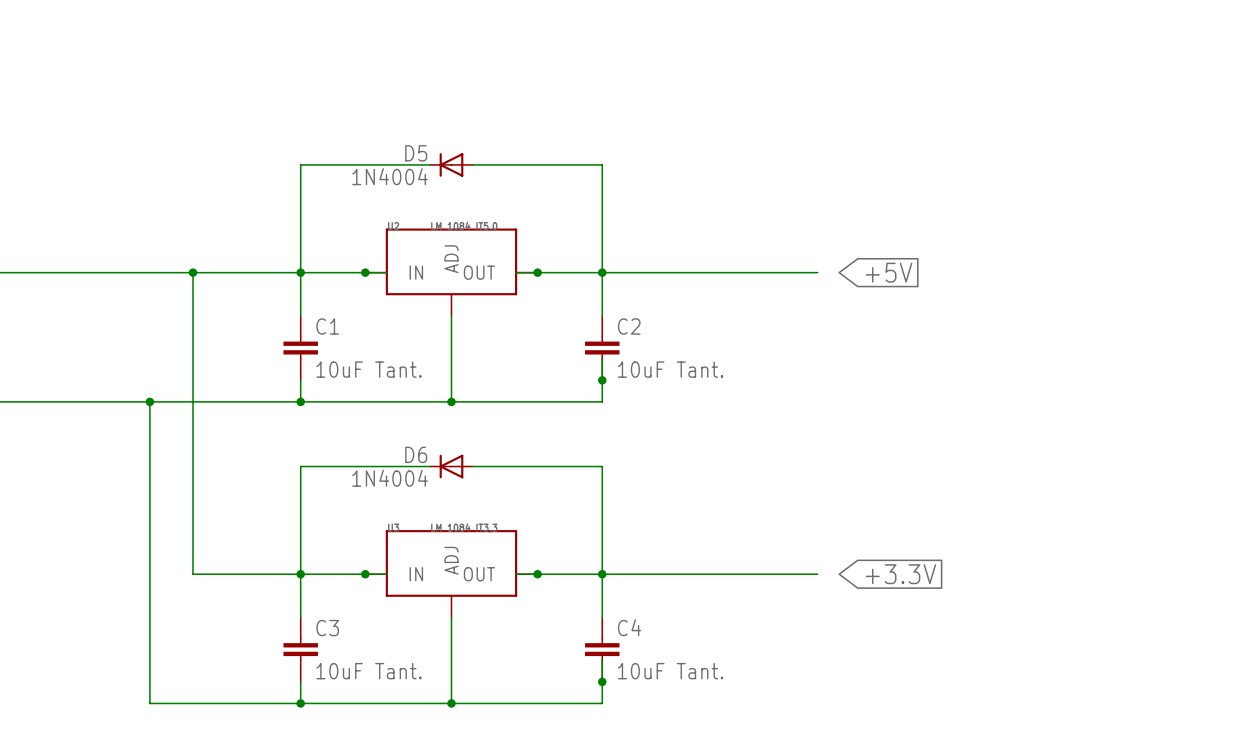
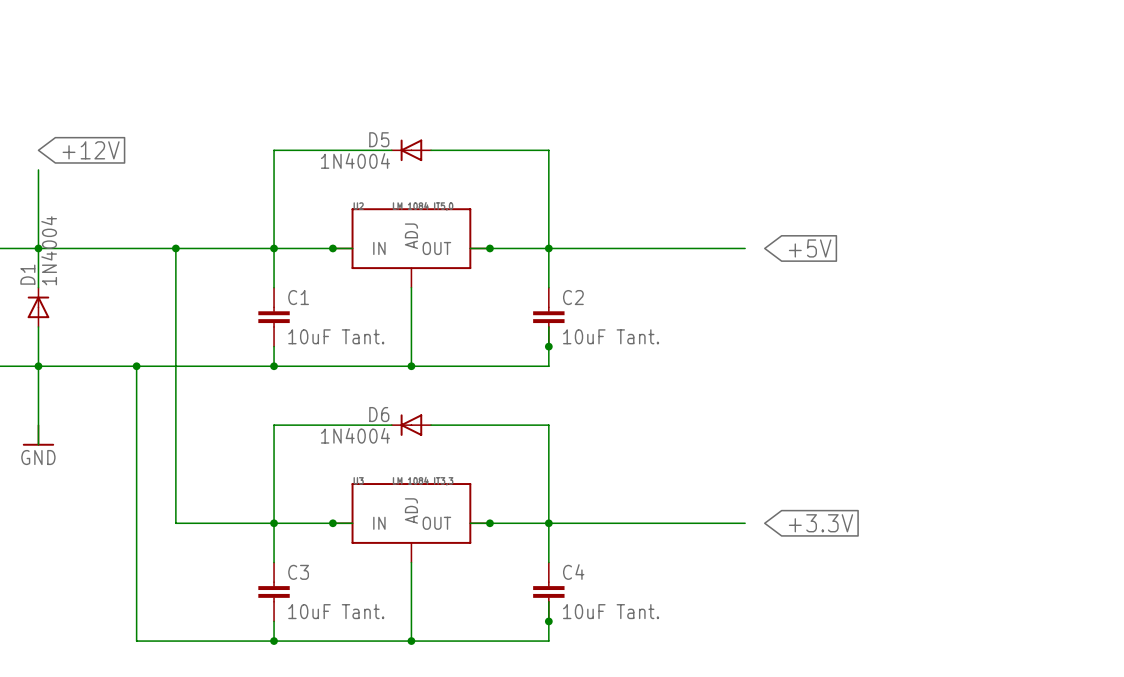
global label: none -> +12V (91, 150)
wire: none -> (38, 169) (38, 287)
junction: none -> (38, 248)
D1: none -> 1N4004 (38, 307)
wire: none -> (38, 326) (38, 444)
junction: none -> (38, 366)
power symbol: none -> GND (38, 435)

